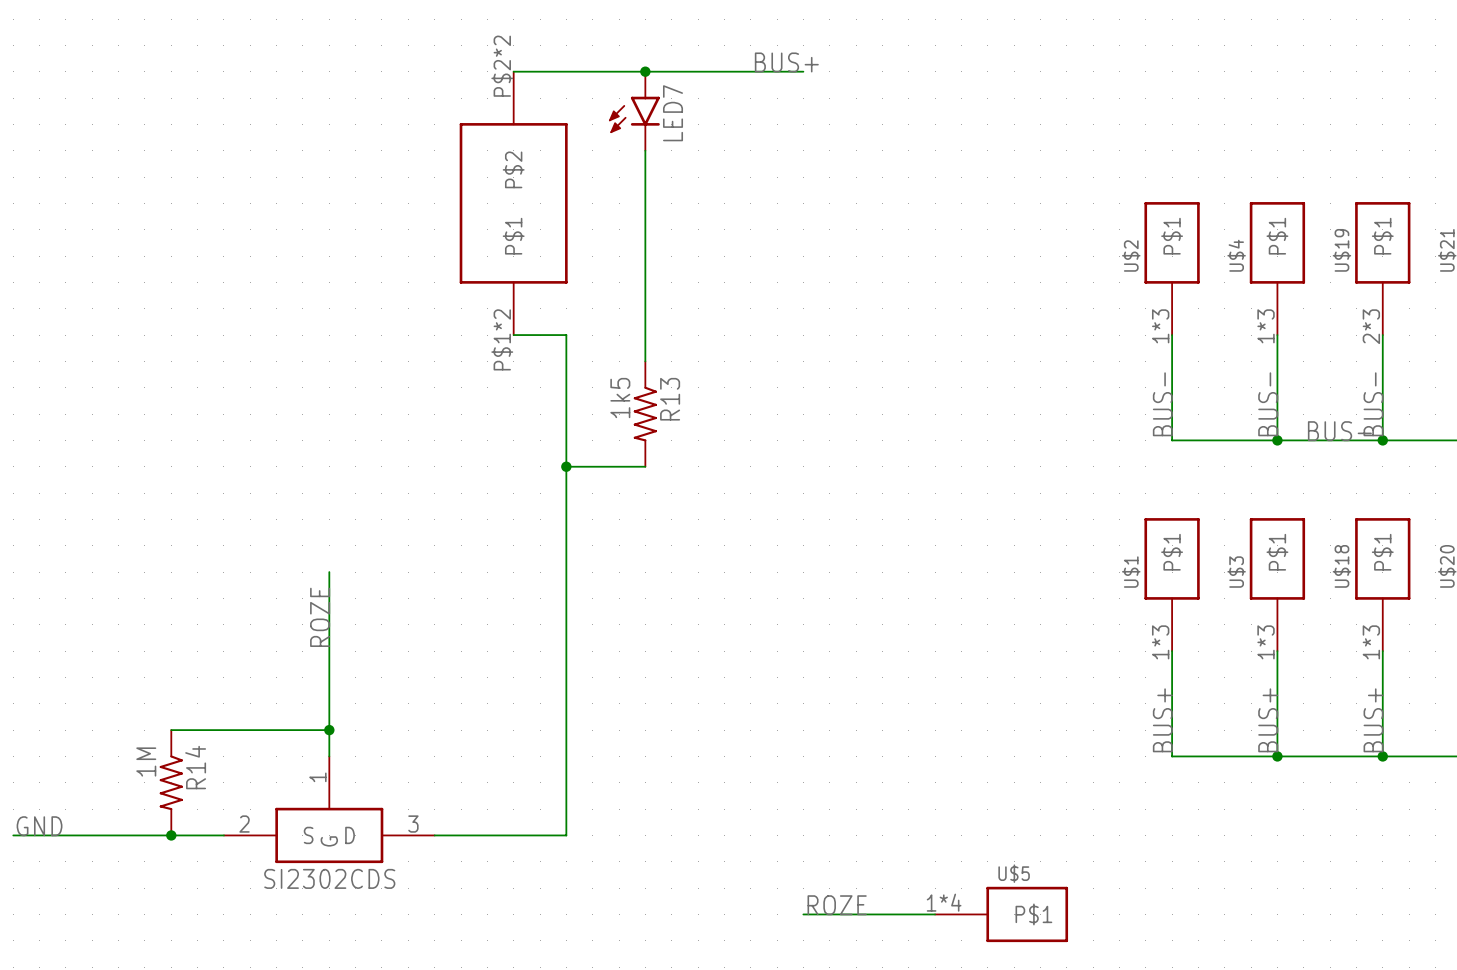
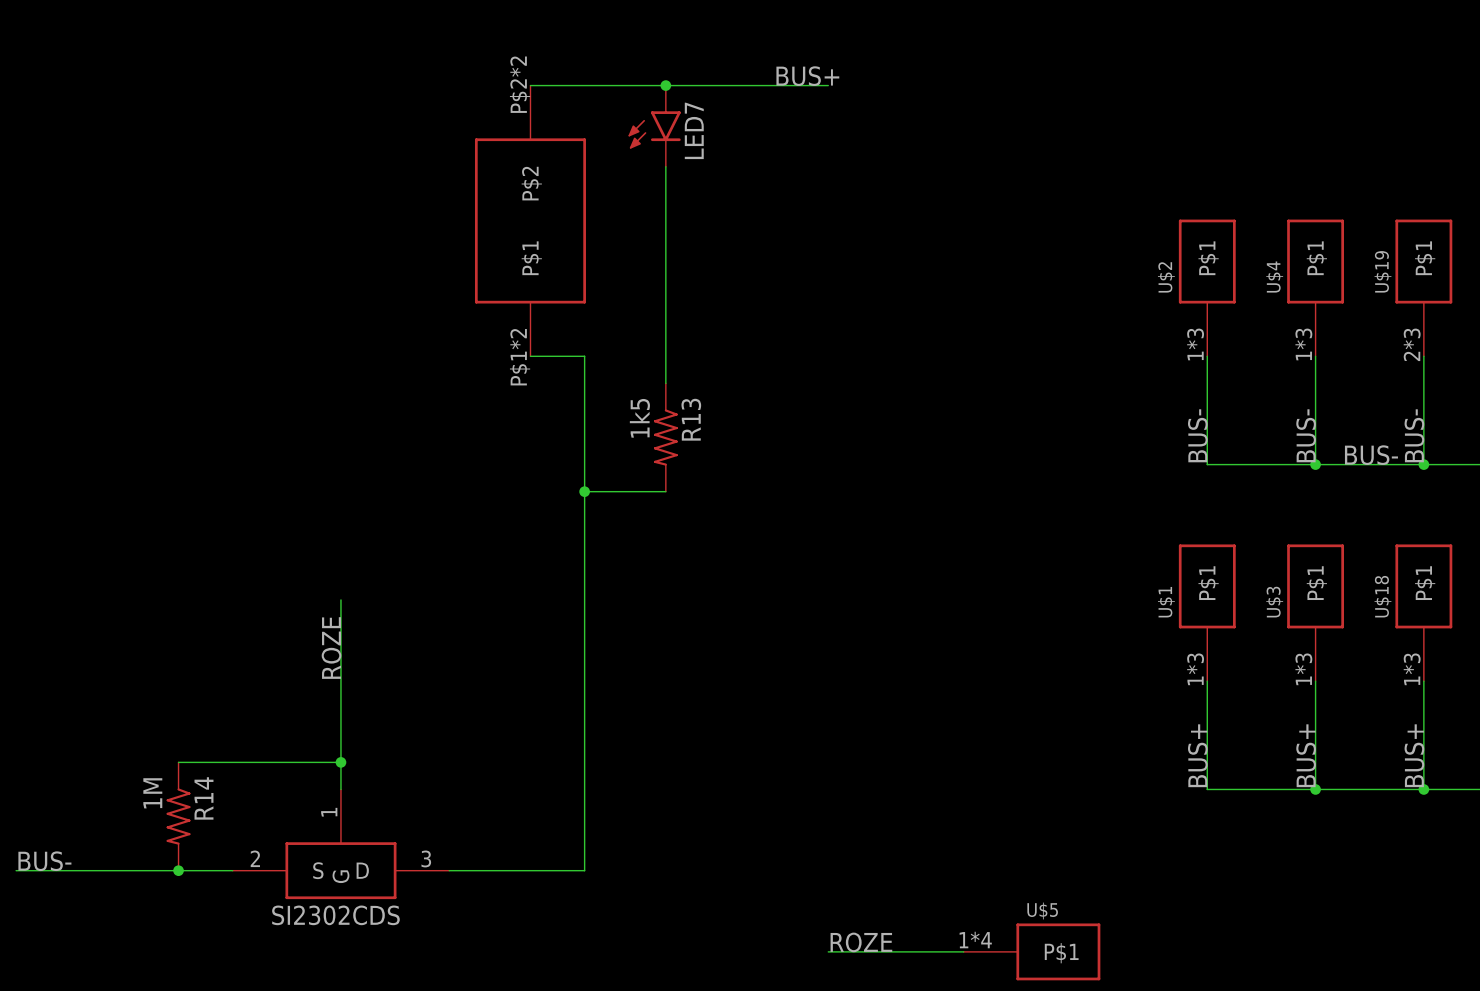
label: GND (39, 826) -> BUS- (44, 861)

